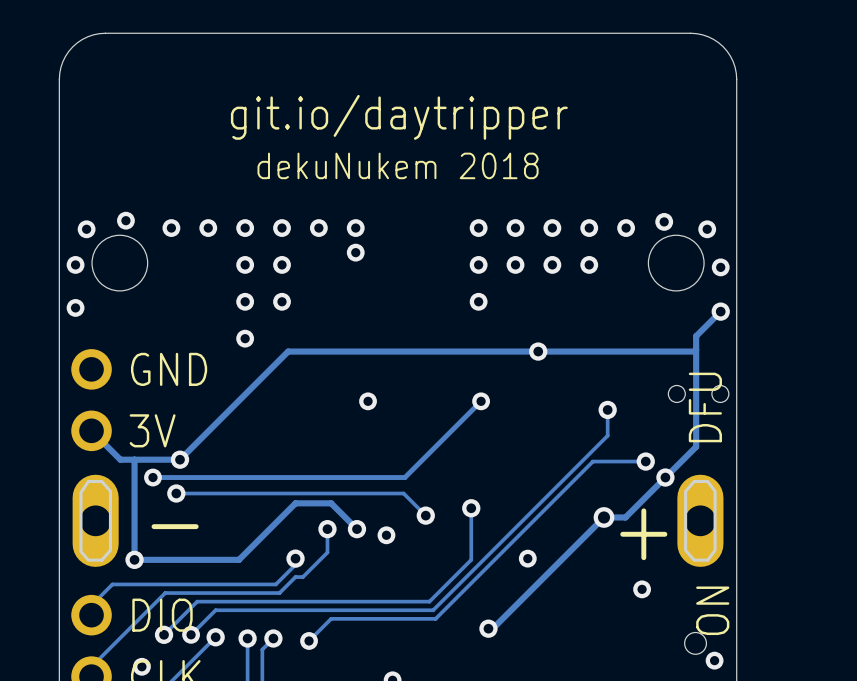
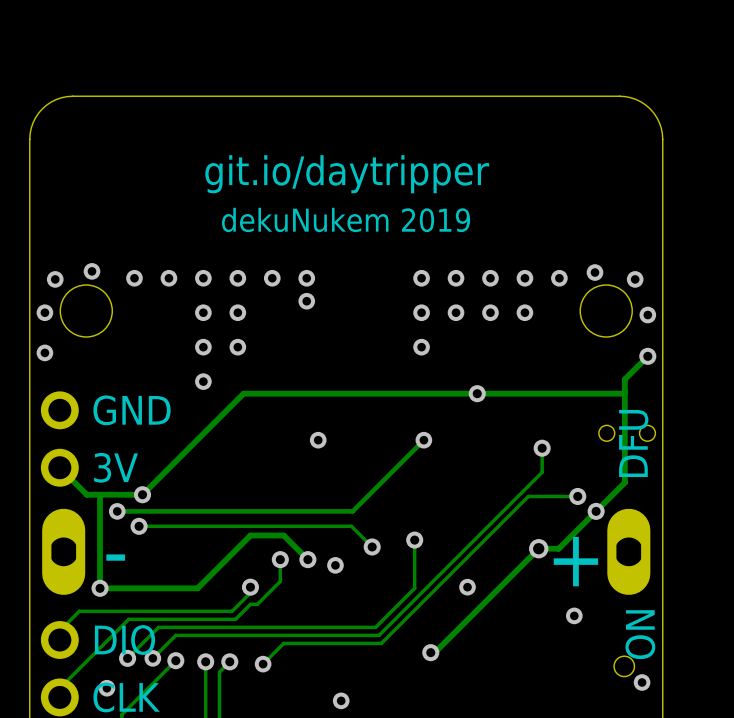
text: dekuNukem 2018 (398, 165) -> dekuNukem 2019 (346, 219)

